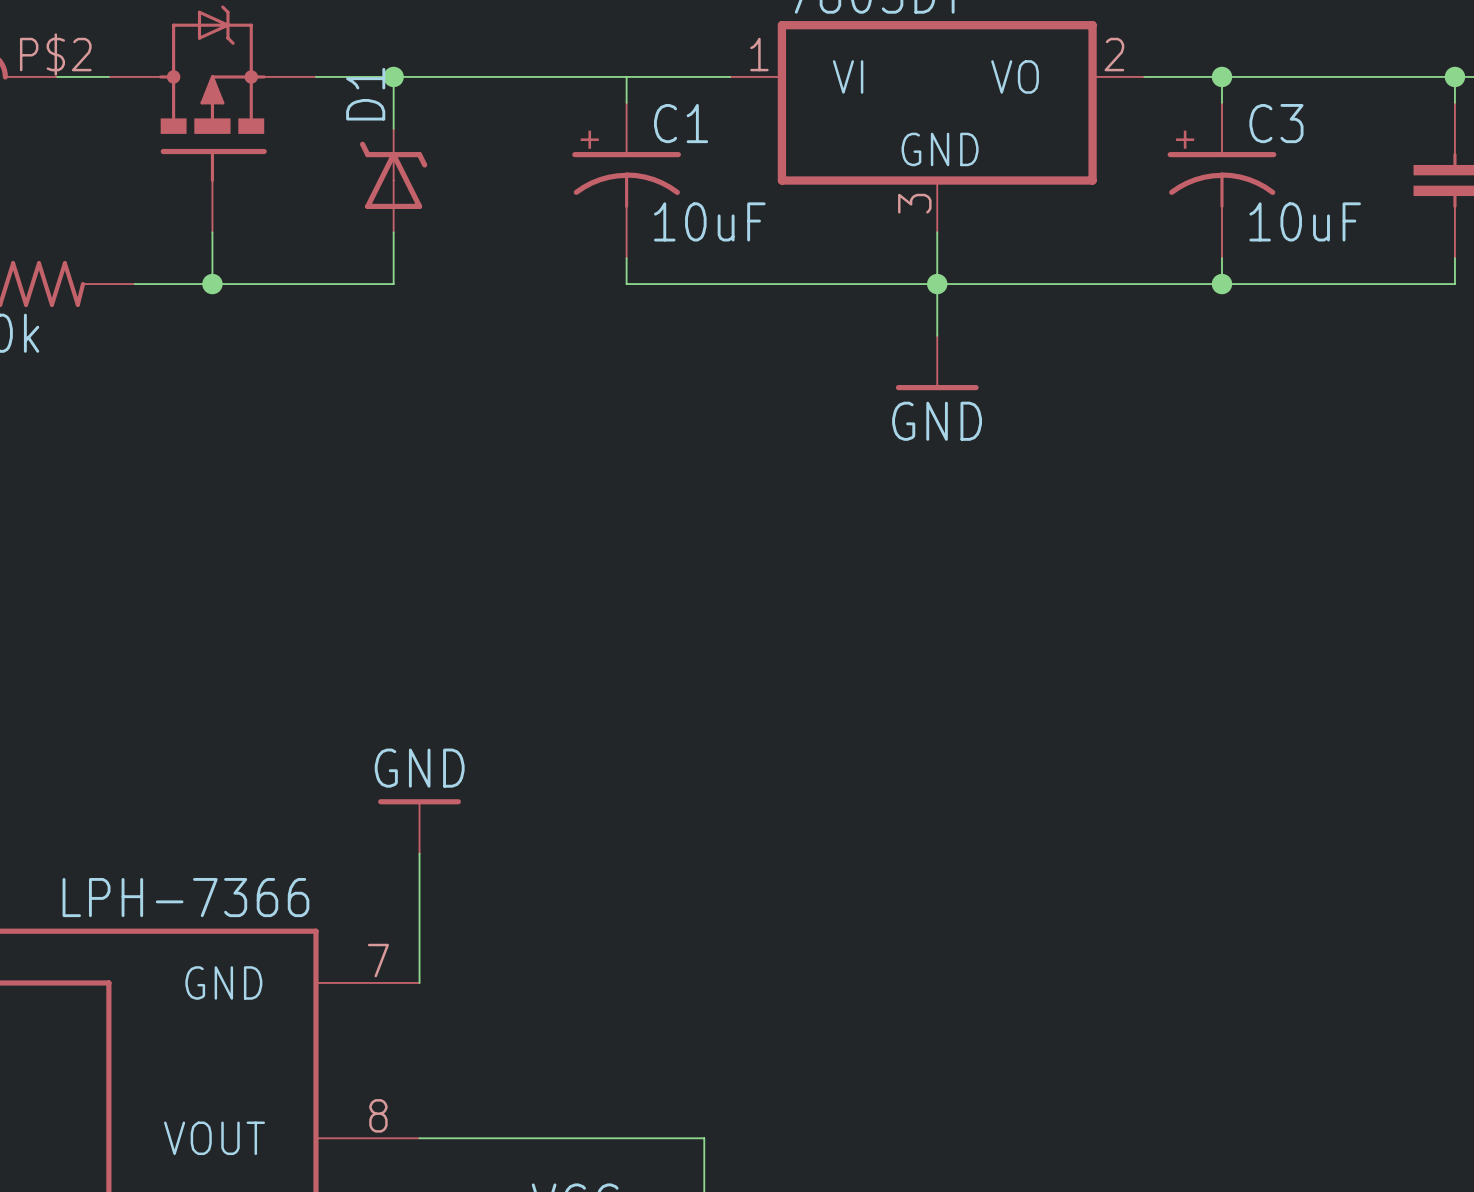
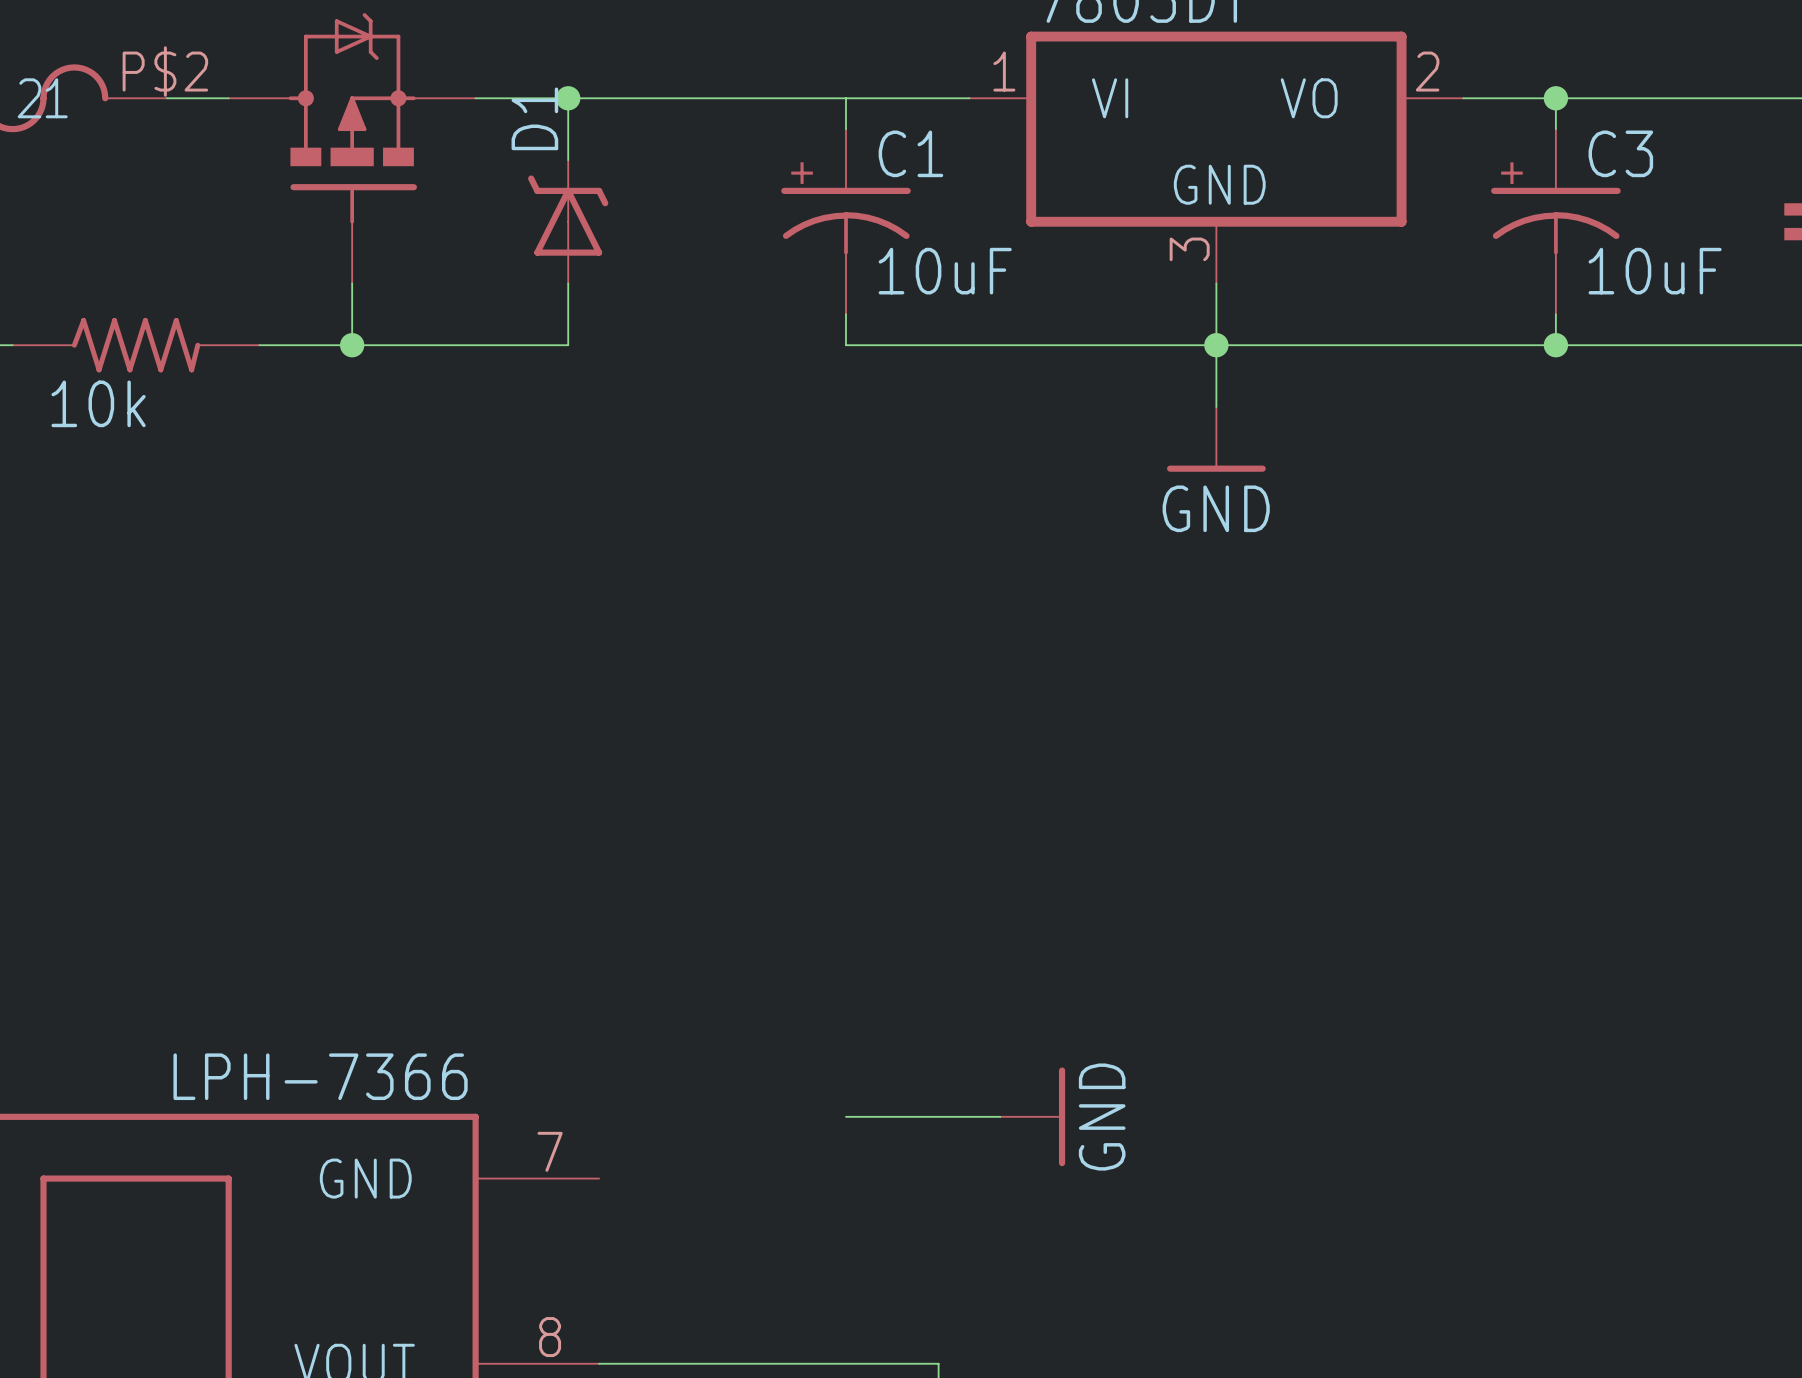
power symbol: GND (419, 826) -> none
wire: (419, 853) (419, 982) -> none
wire: none -> (846, 1116) (1000, 1116)
power symbol: none -> GND (1032, 1116)

